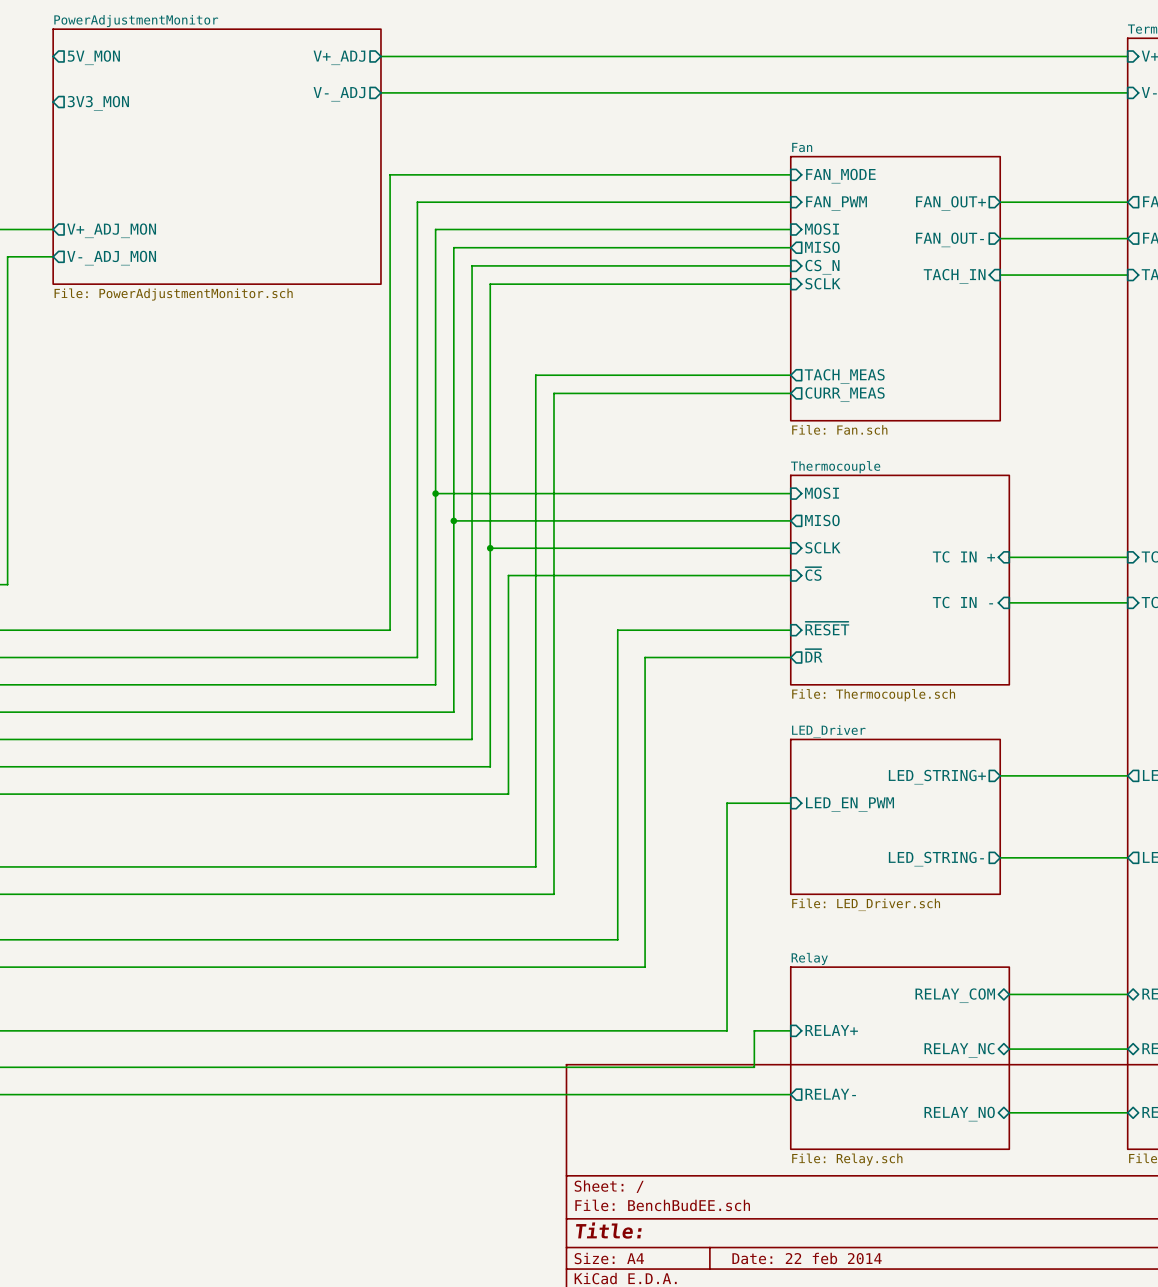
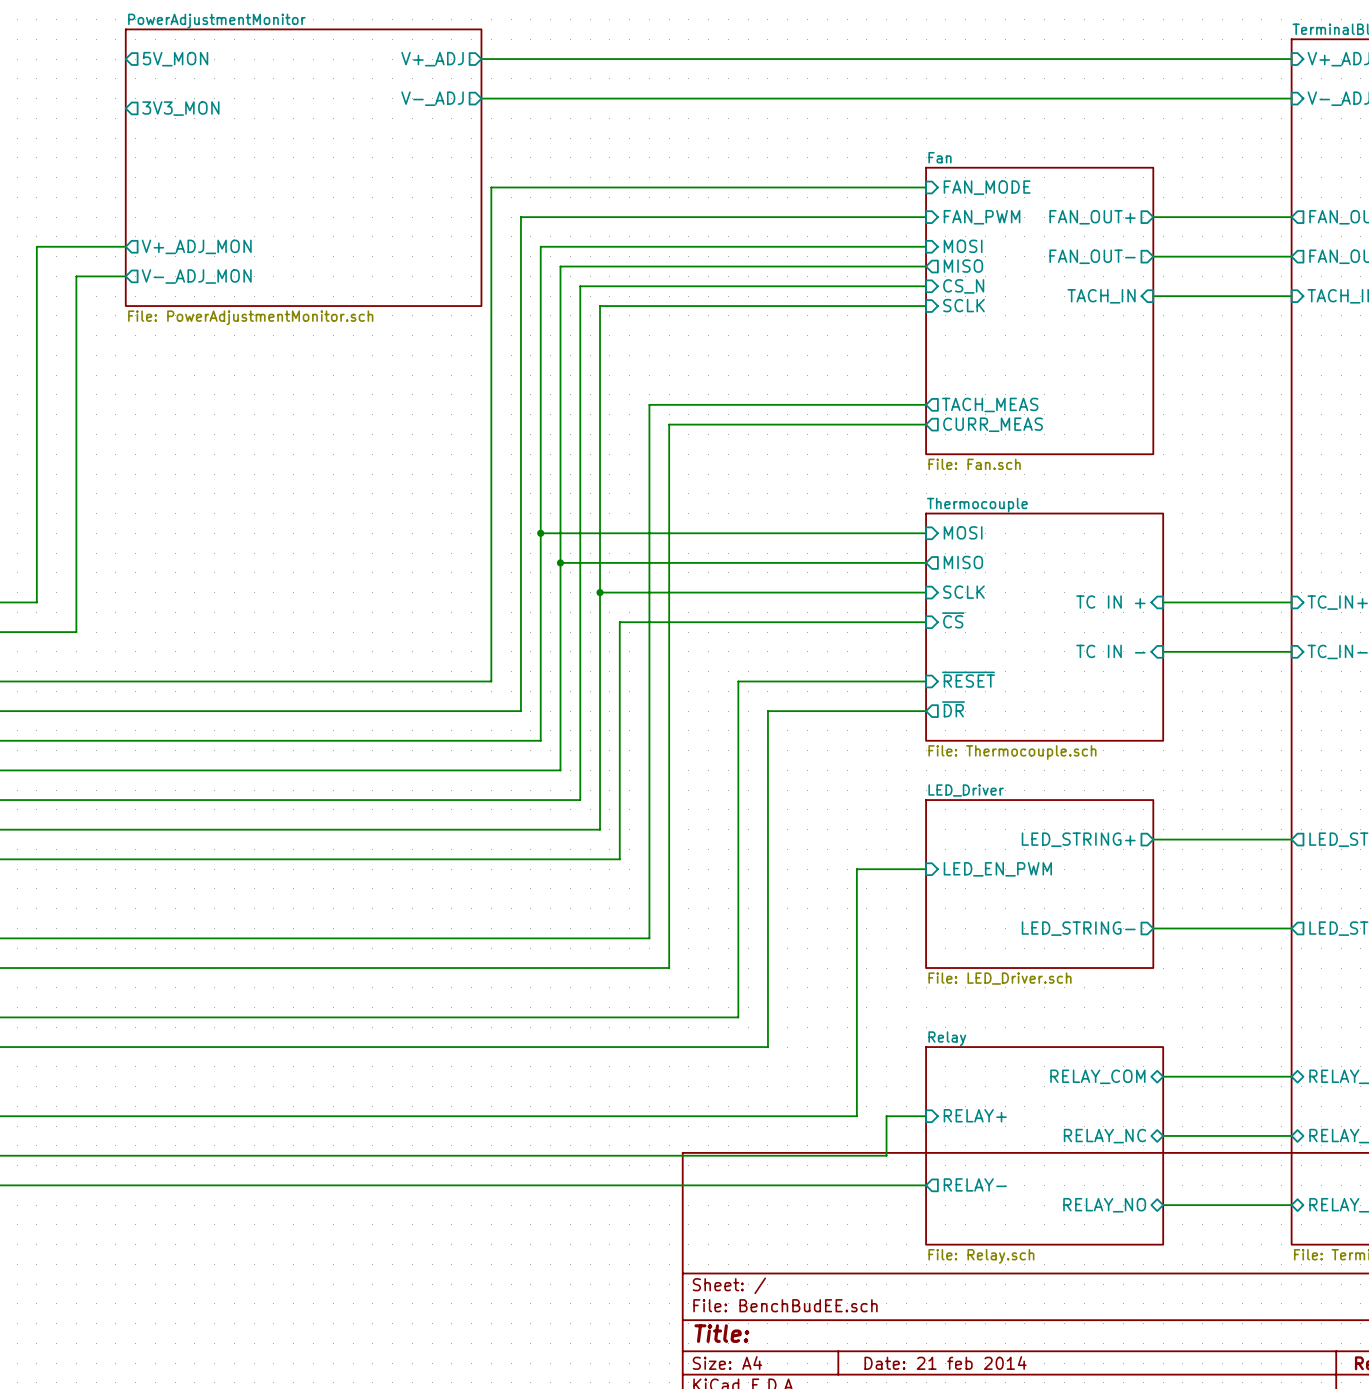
title block: Date: 22 feb 2014 (807, 1258) -> Date: 21 feb 2014 (945, 1363)

